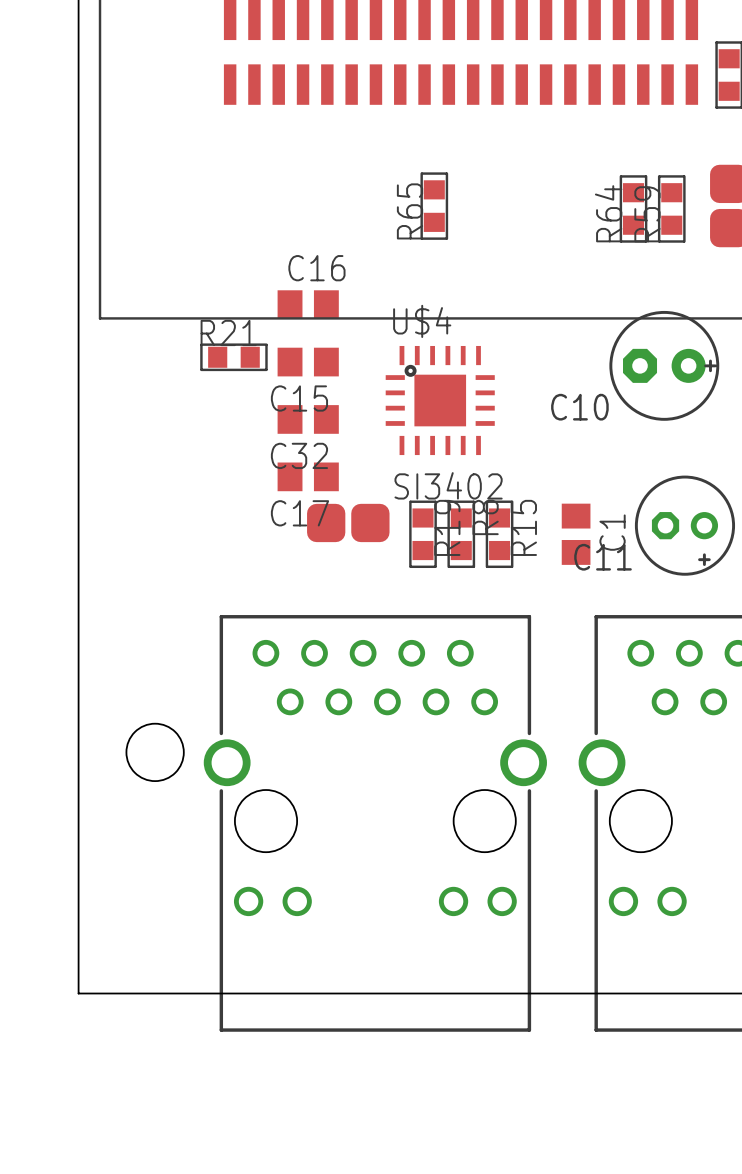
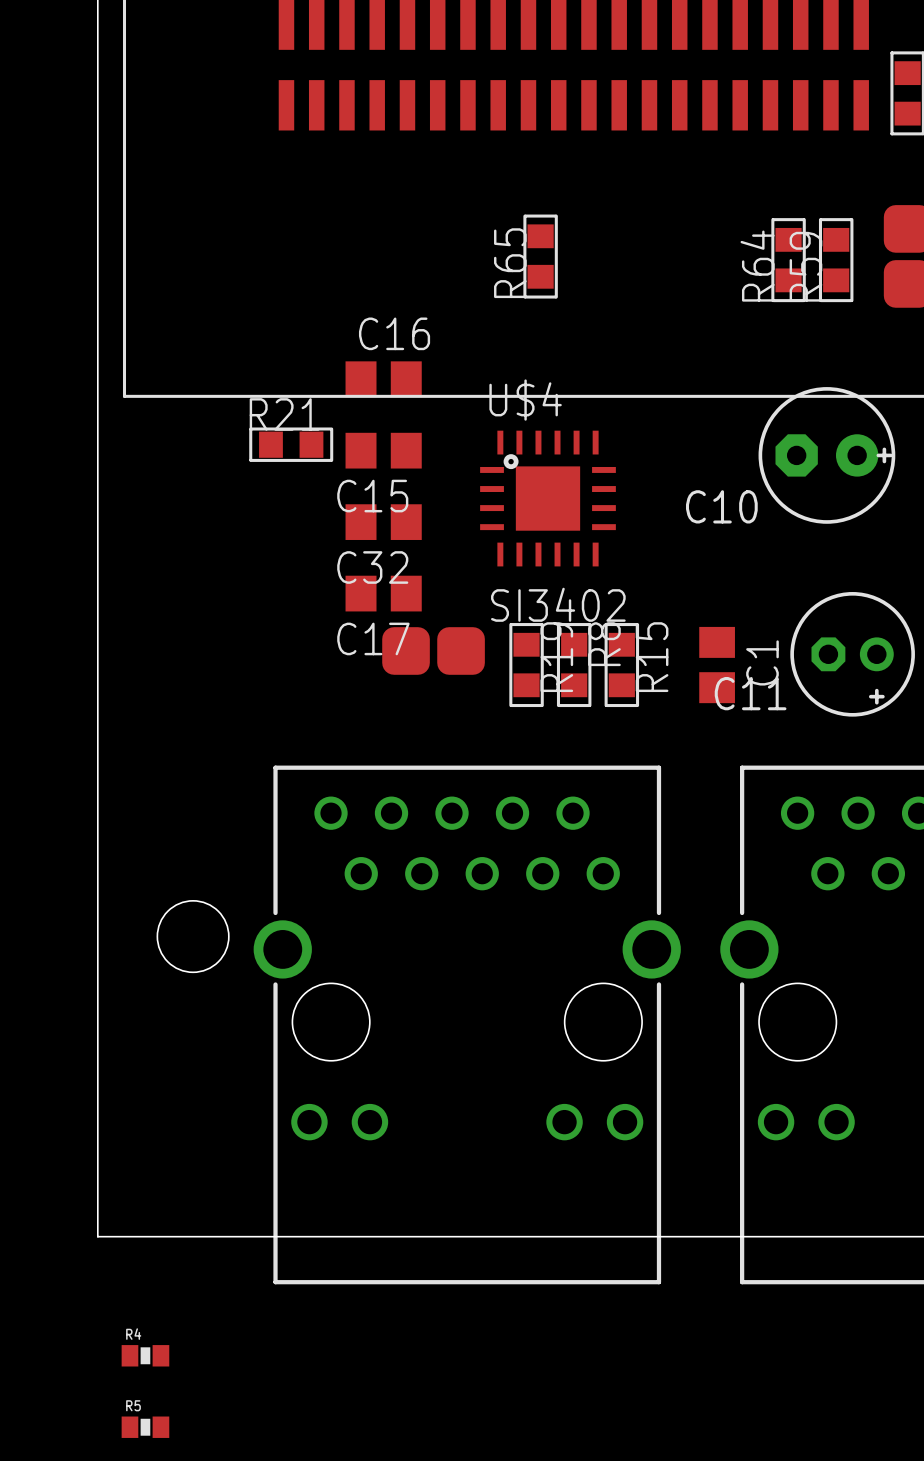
R4: none -> (145, 1355)
R5: none -> (145, 1427)

